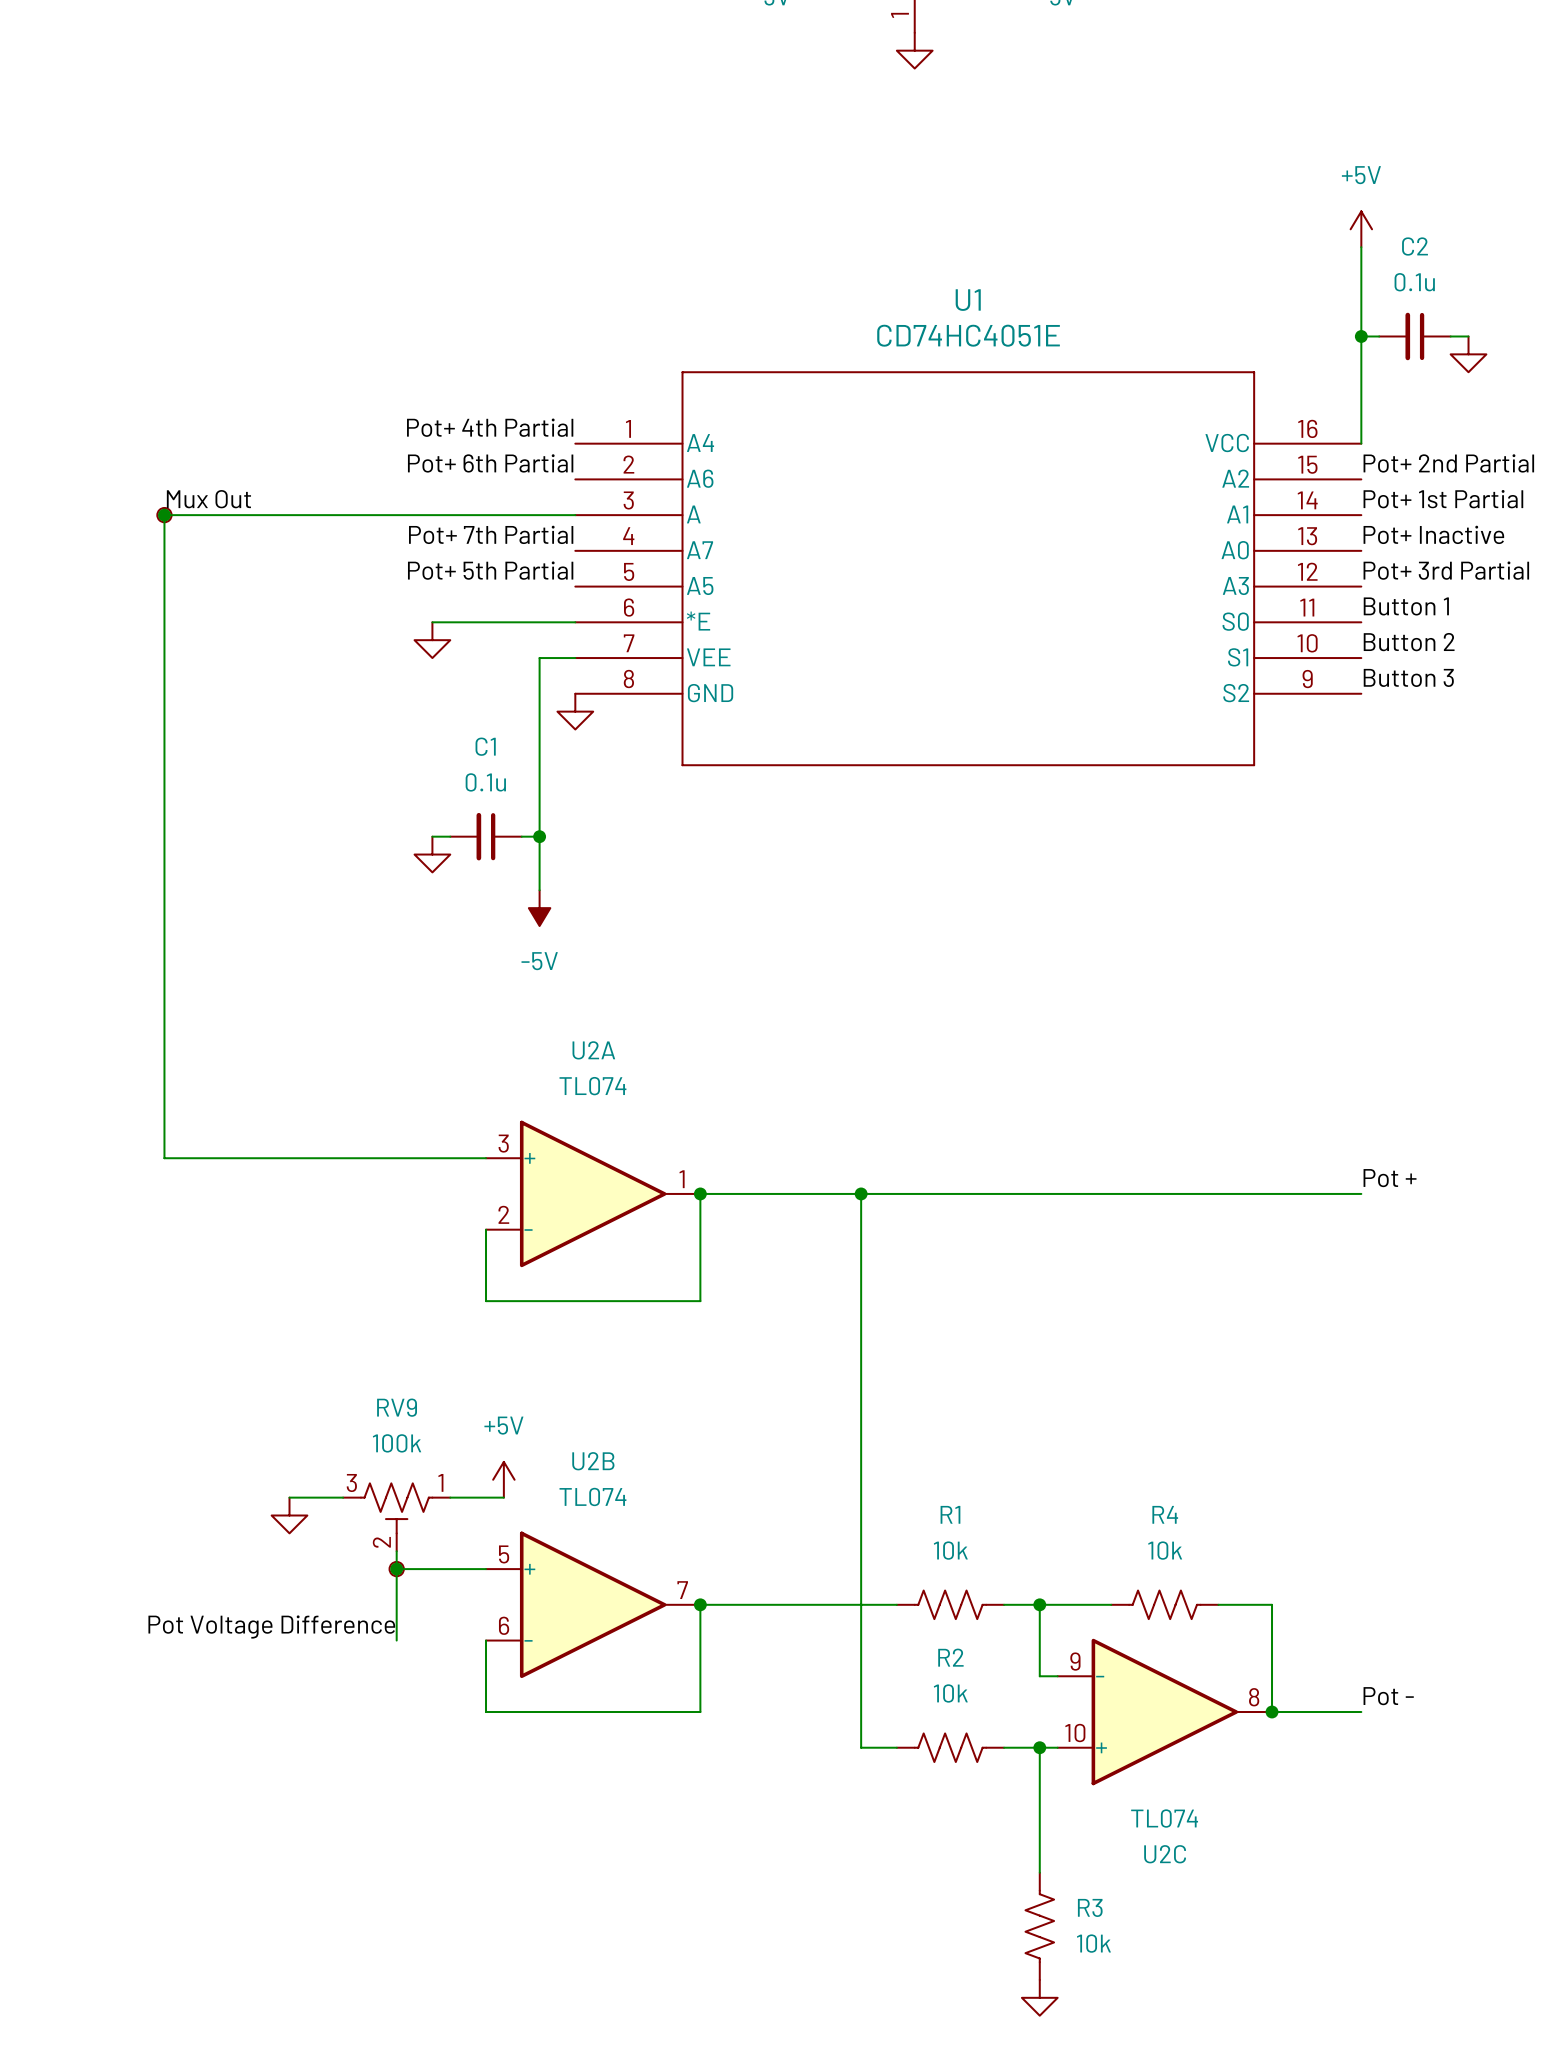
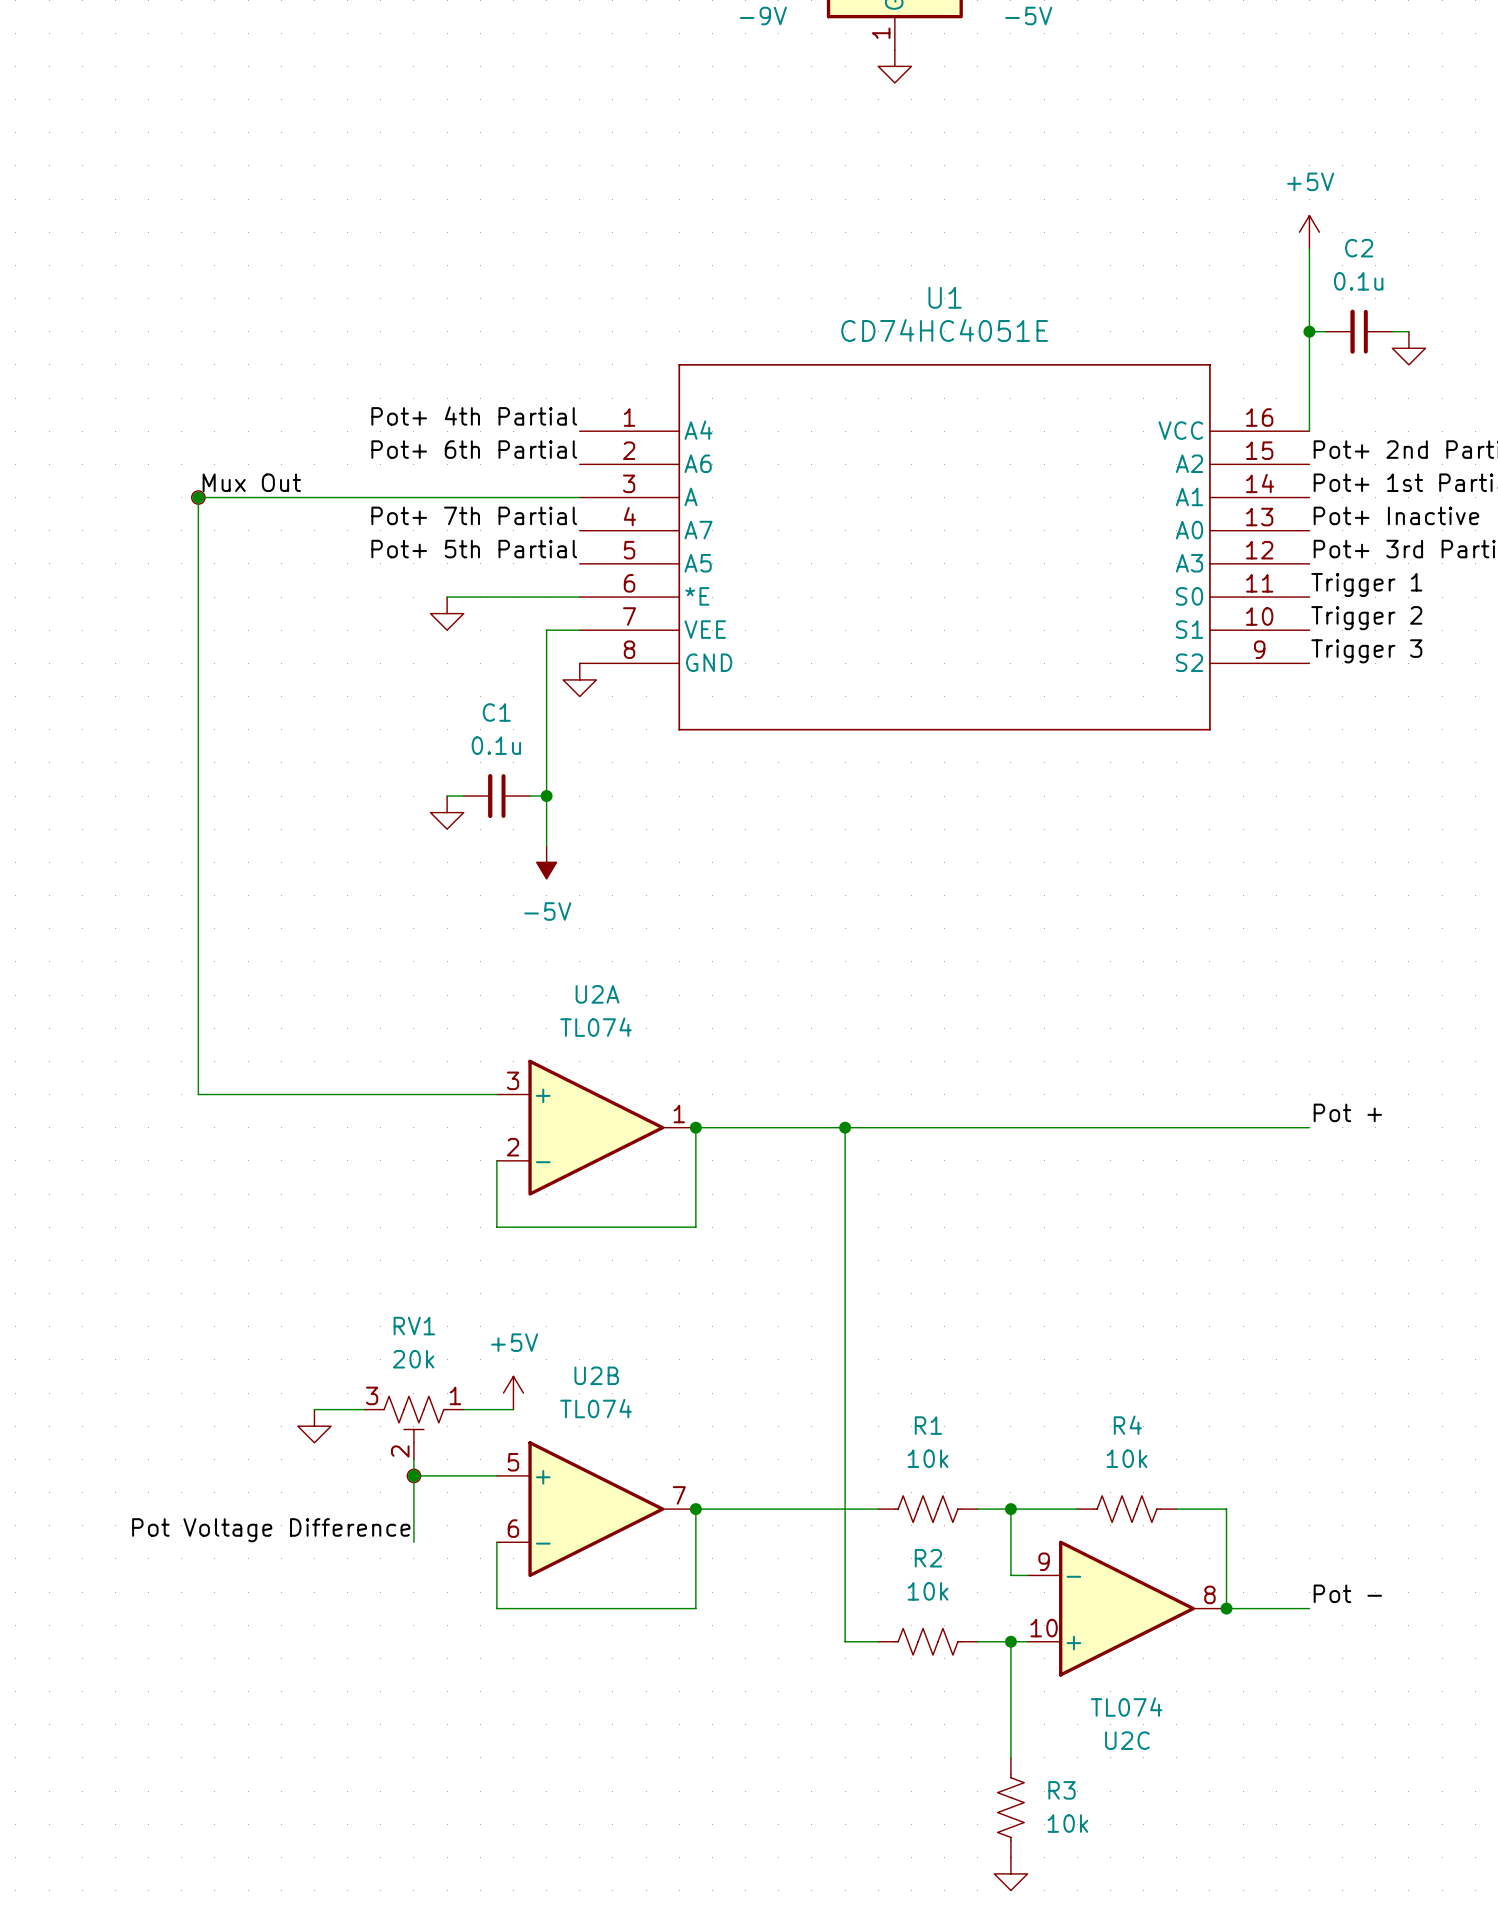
label: Button 1 (1406, 606) -> Trigger 1 (1366, 584)
label: Button 2 (1409, 642) -> Trigger 2 (1366, 618)
label: Button 3 (1408, 677) -> Trigger 3 (1366, 651)
RV9 name: RV9 (397, 1407) -> RV1 (414, 1326)
RV9 value: 100k (397, 1443) -> 20k (413, 1359)

